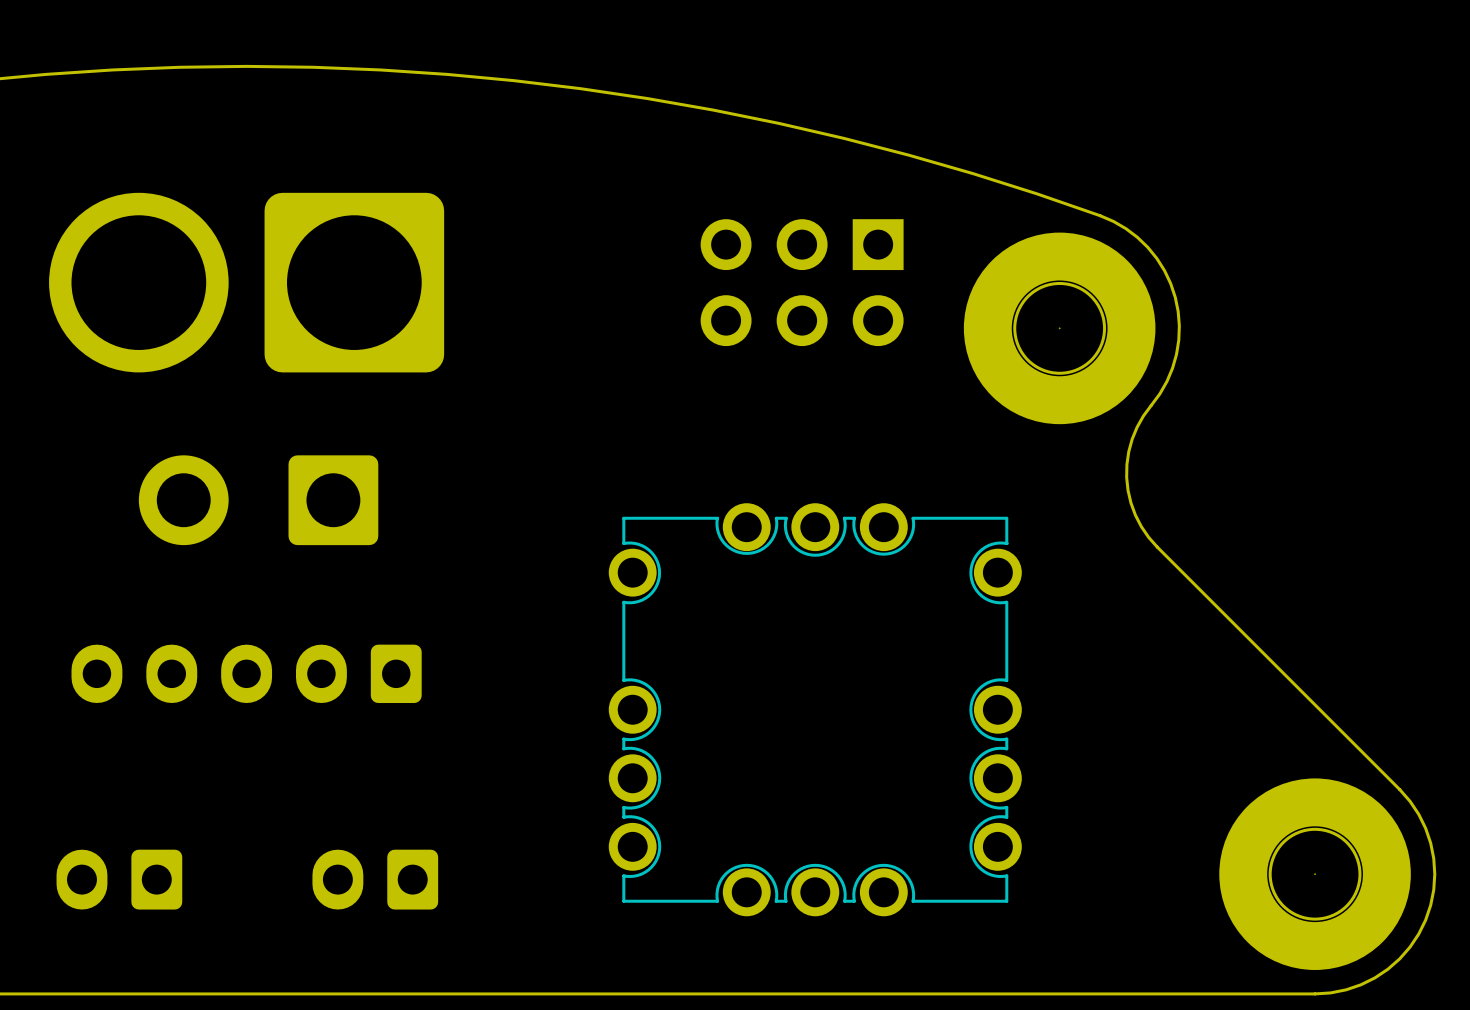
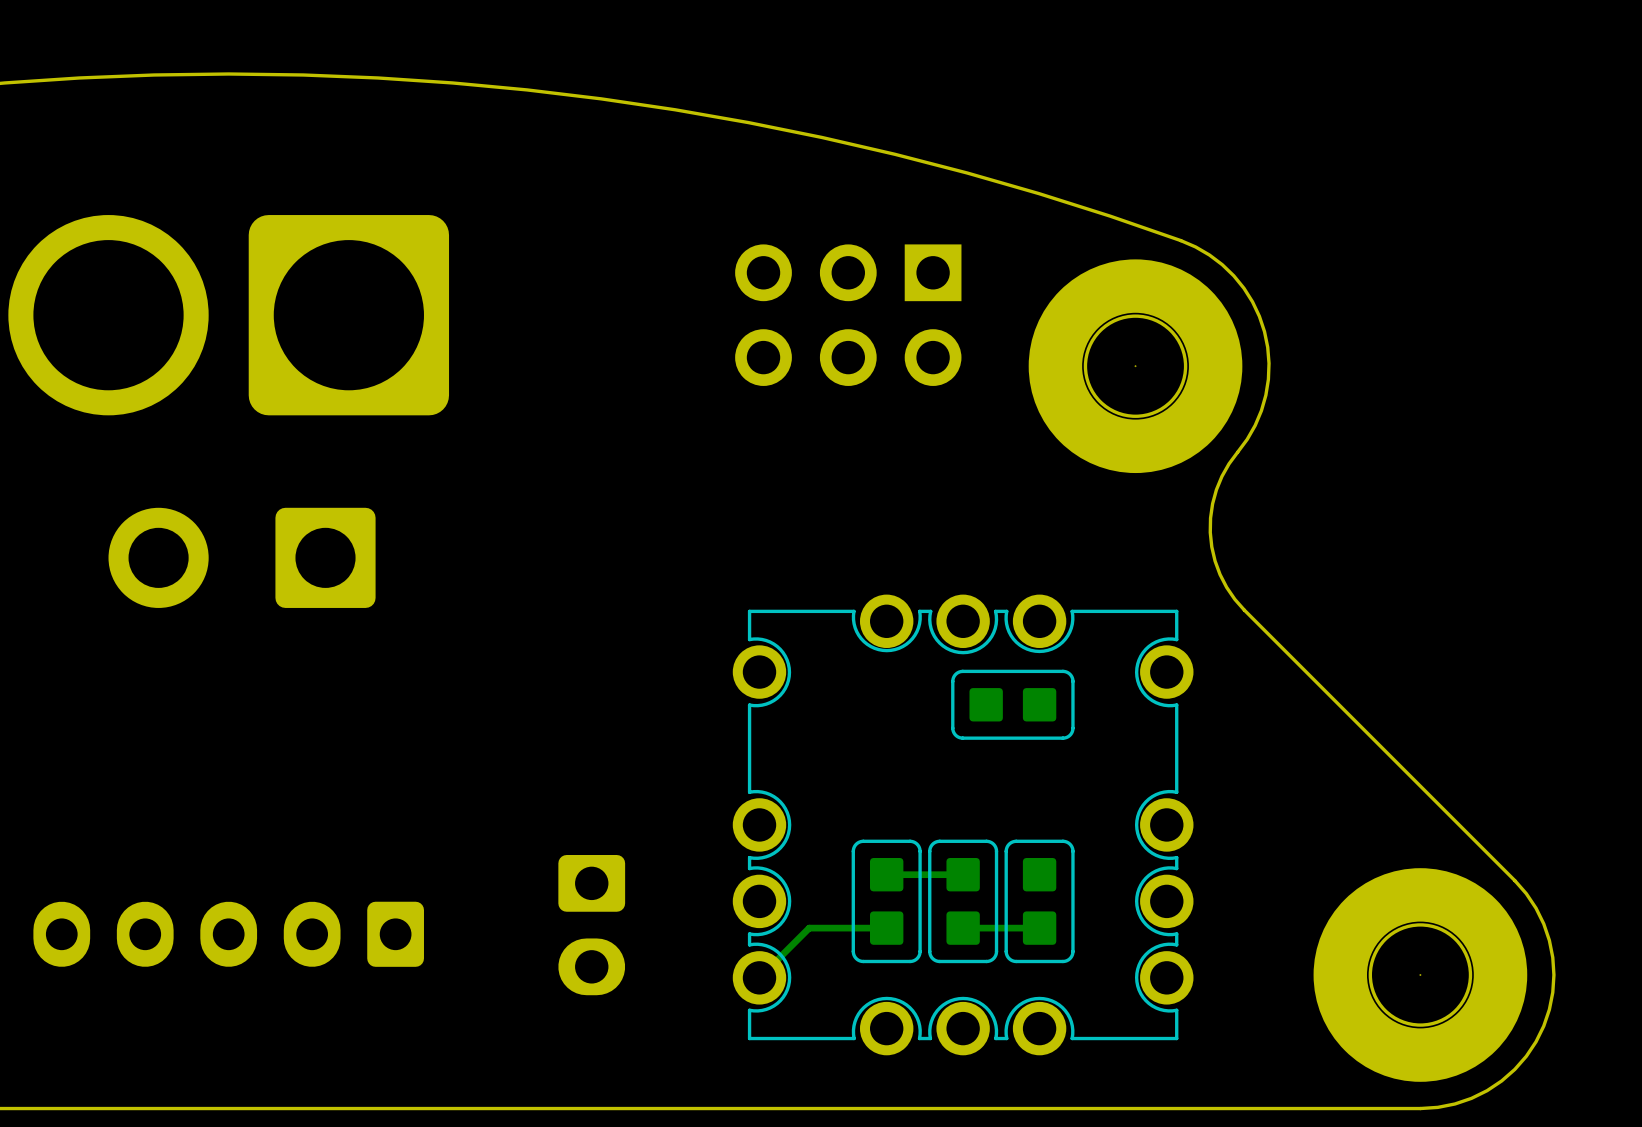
part: none -> (1012, 704)
part position: (246, 673) -> (228, 934)
part position: (815, 709) -> (963, 824)
track: none -> (963, 874) (886, 874)
part: none -> (886, 901)
part: none -> (963, 901)
part: none -> (1039, 901)
track: none -> (886, 928) (809, 928) (759, 977)
track: none -> (1039, 928) (963, 928)
part: (119, 879) -> none
part rotation: 0° (375, 879) -> 90° counterclockwise (591, 925)
part position: (375, 879) -> (591, 925)

